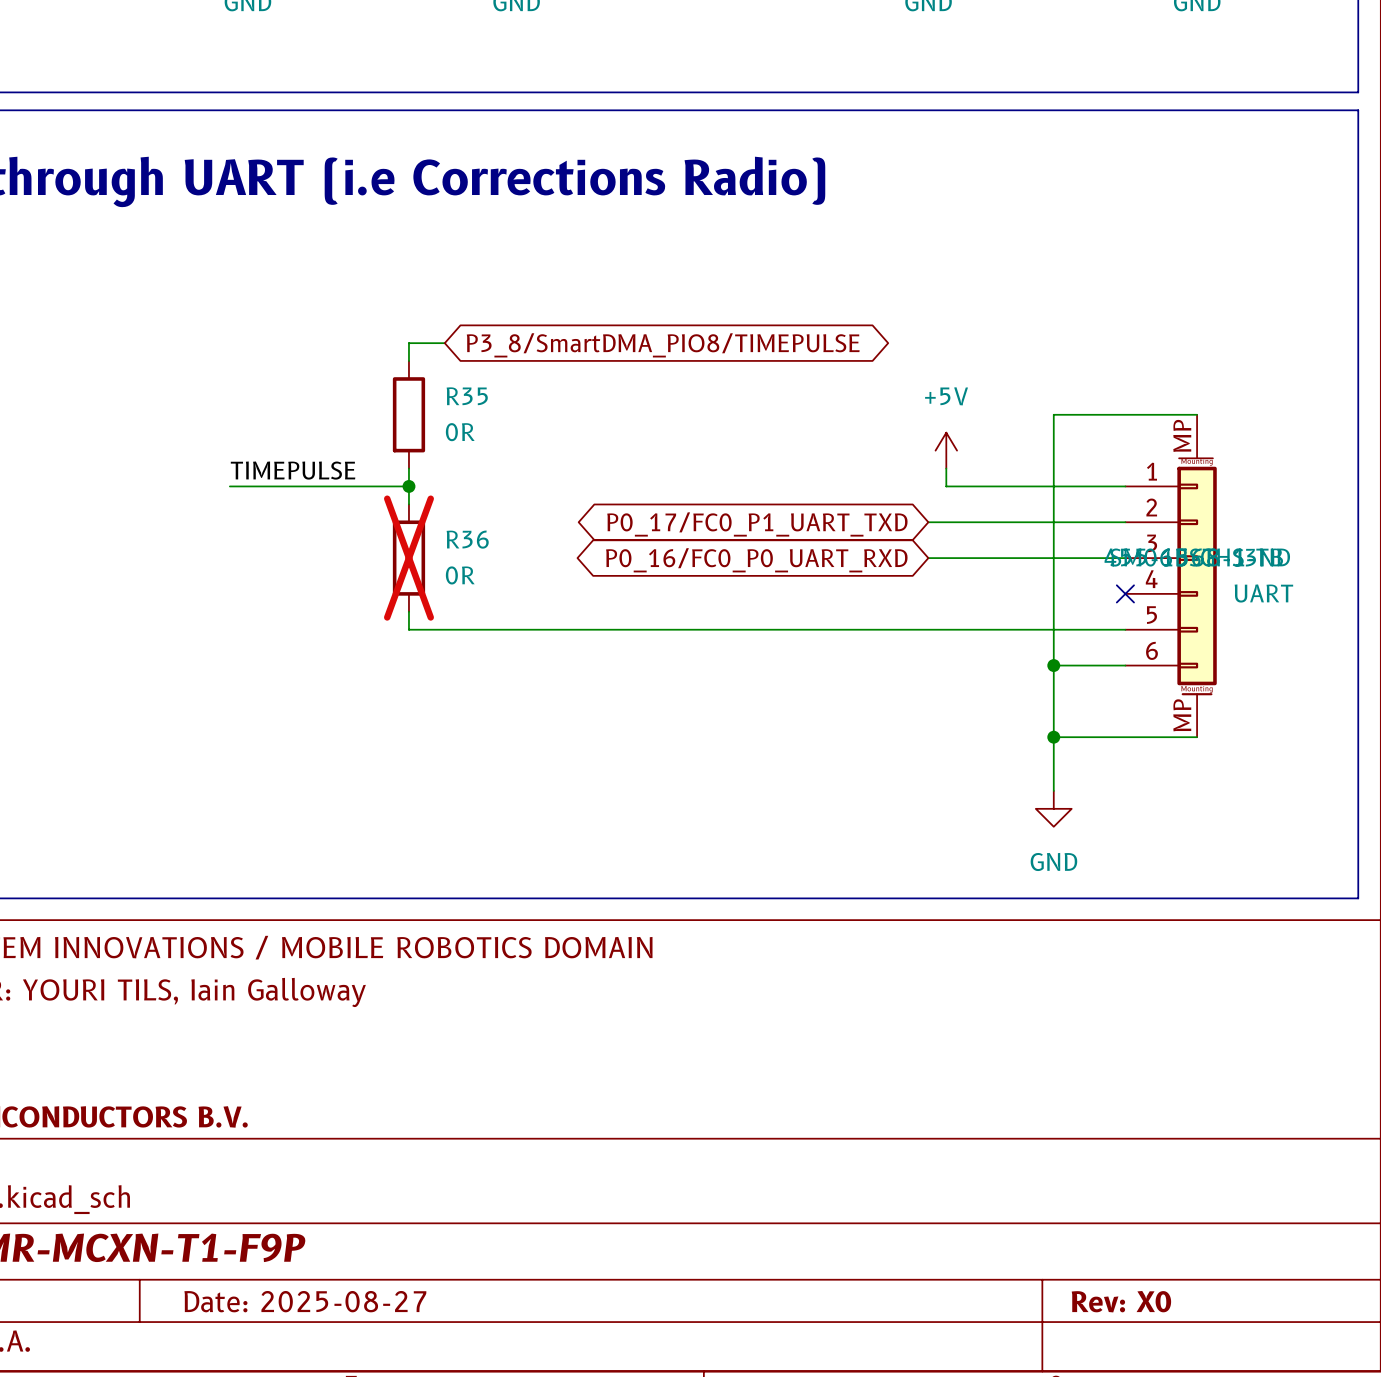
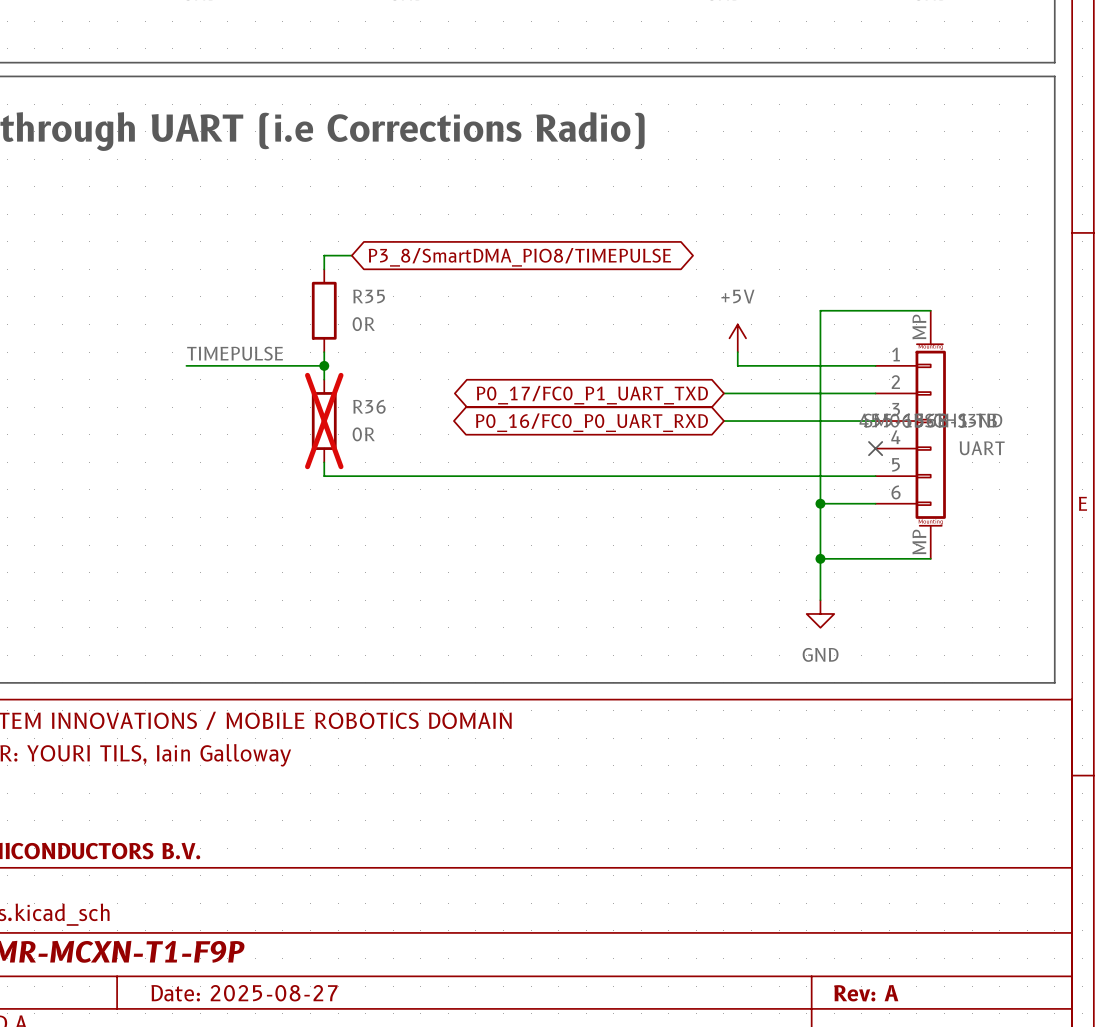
title block: Rev: X0 (1121, 1301) -> Rev: A (866, 993)

